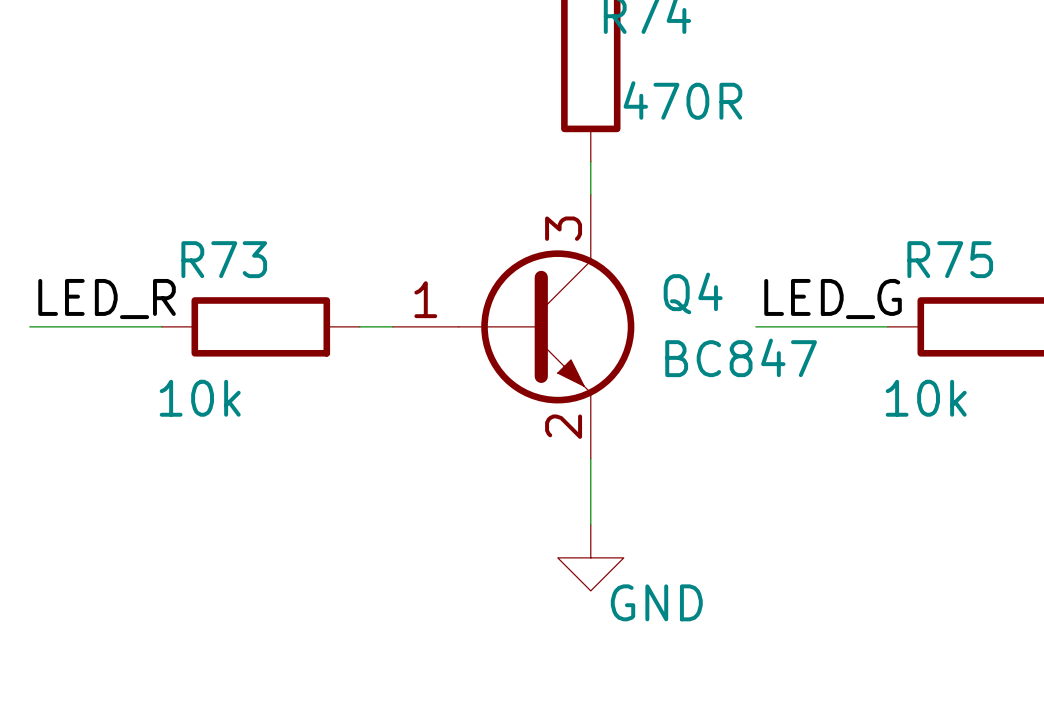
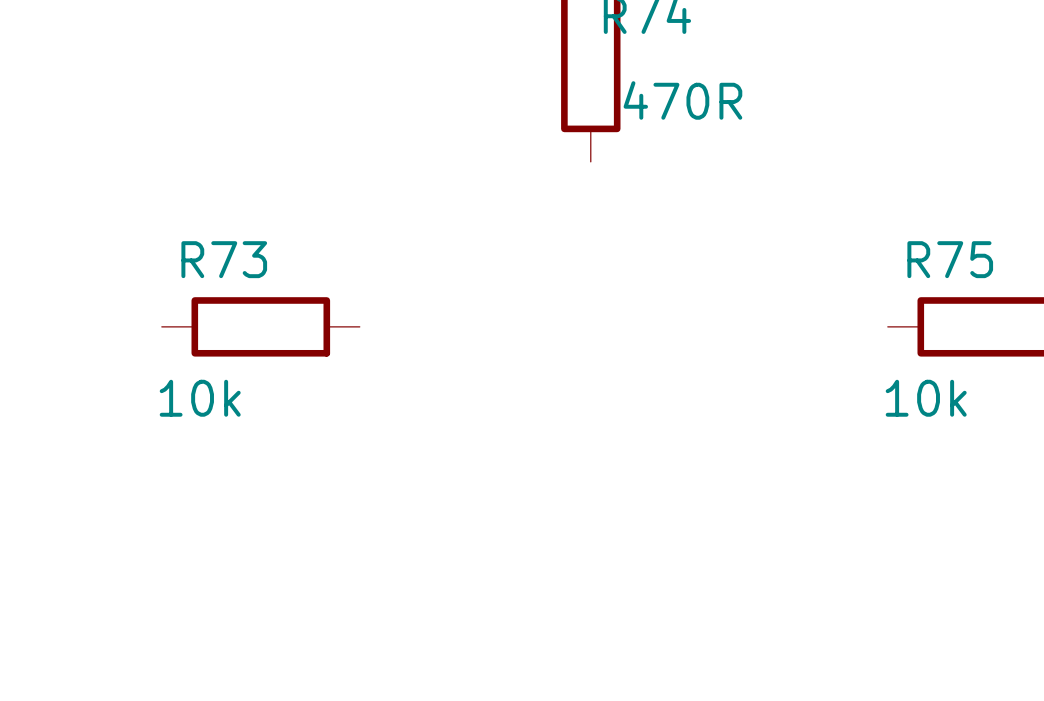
wire: (590, 161) (590, 194) -> none
label: LED_R (107, 299) -> none
label: LED_G (833, 299) -> none
wire: (29, 326) (161, 326) -> none
wire: (359, 326) (392, 326) -> none
Q4: BC847 (513, 326) -> none
wire: (755, 326) (887, 326) -> none
wire: (590, 458) (590, 524) -> none
power symbol: GND (590, 557) -> none

